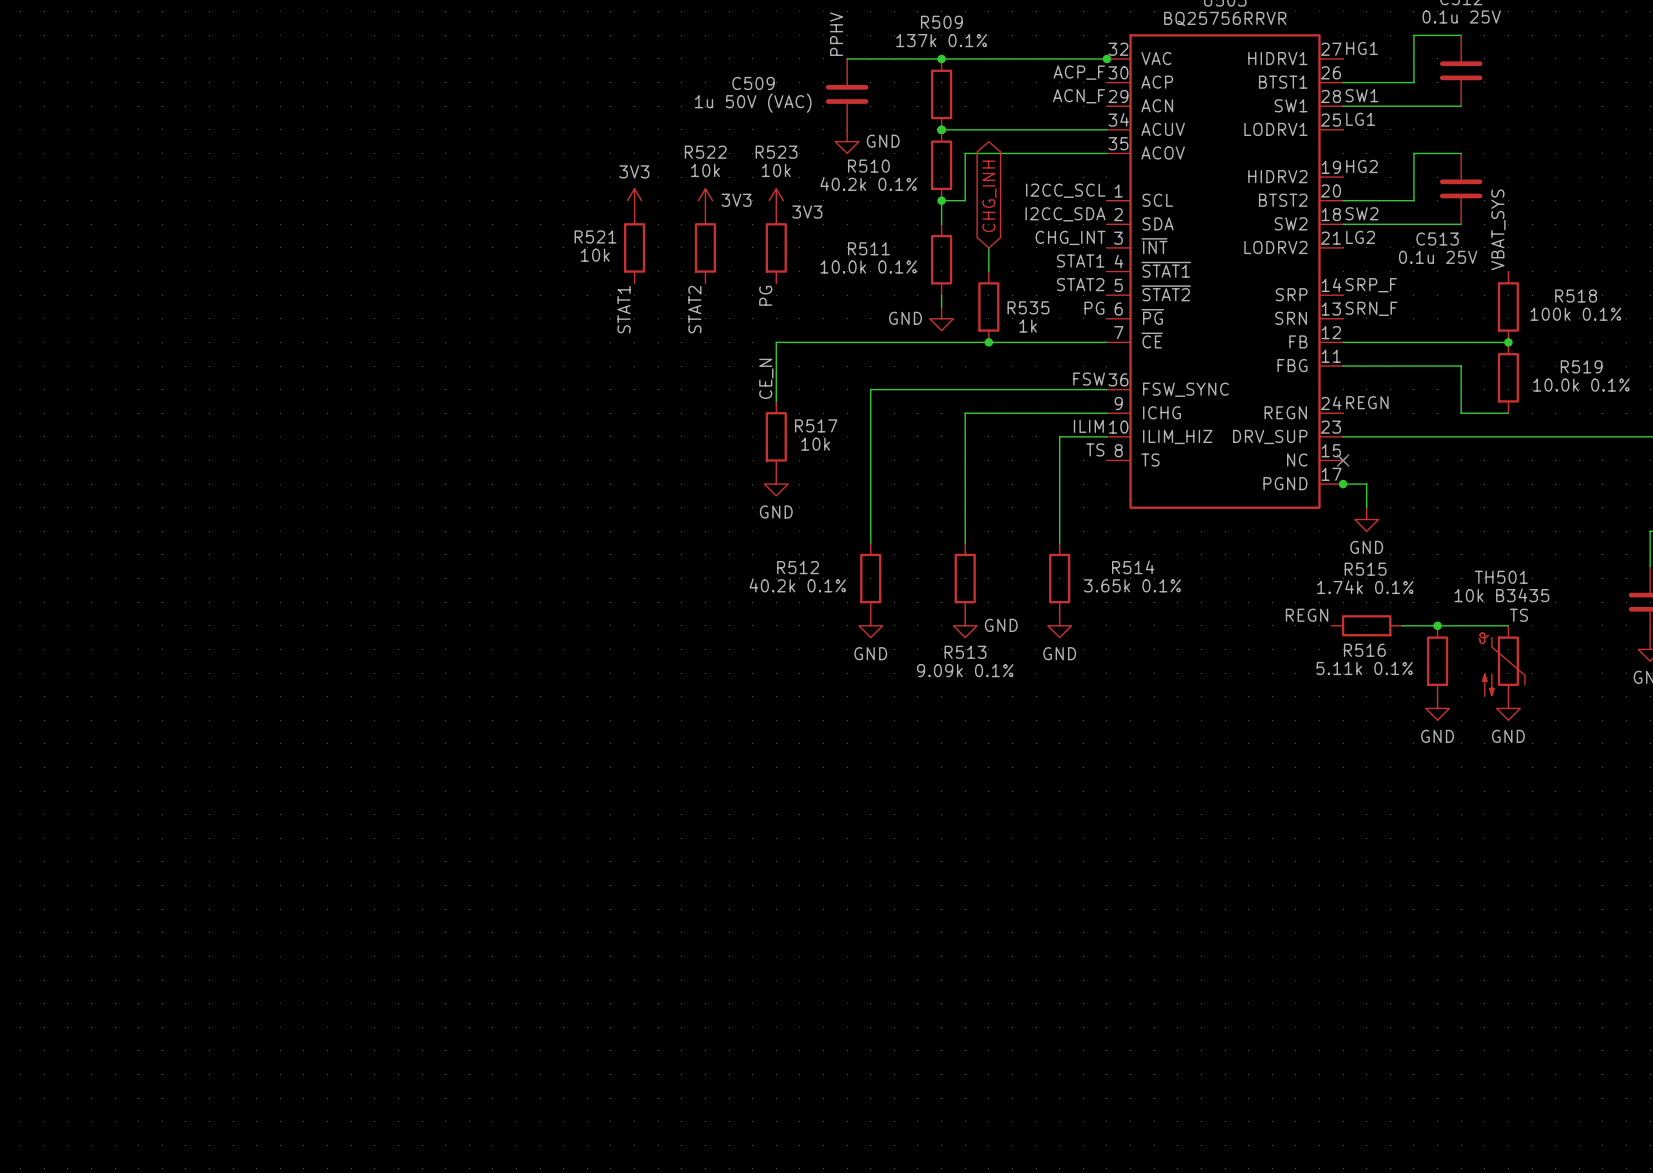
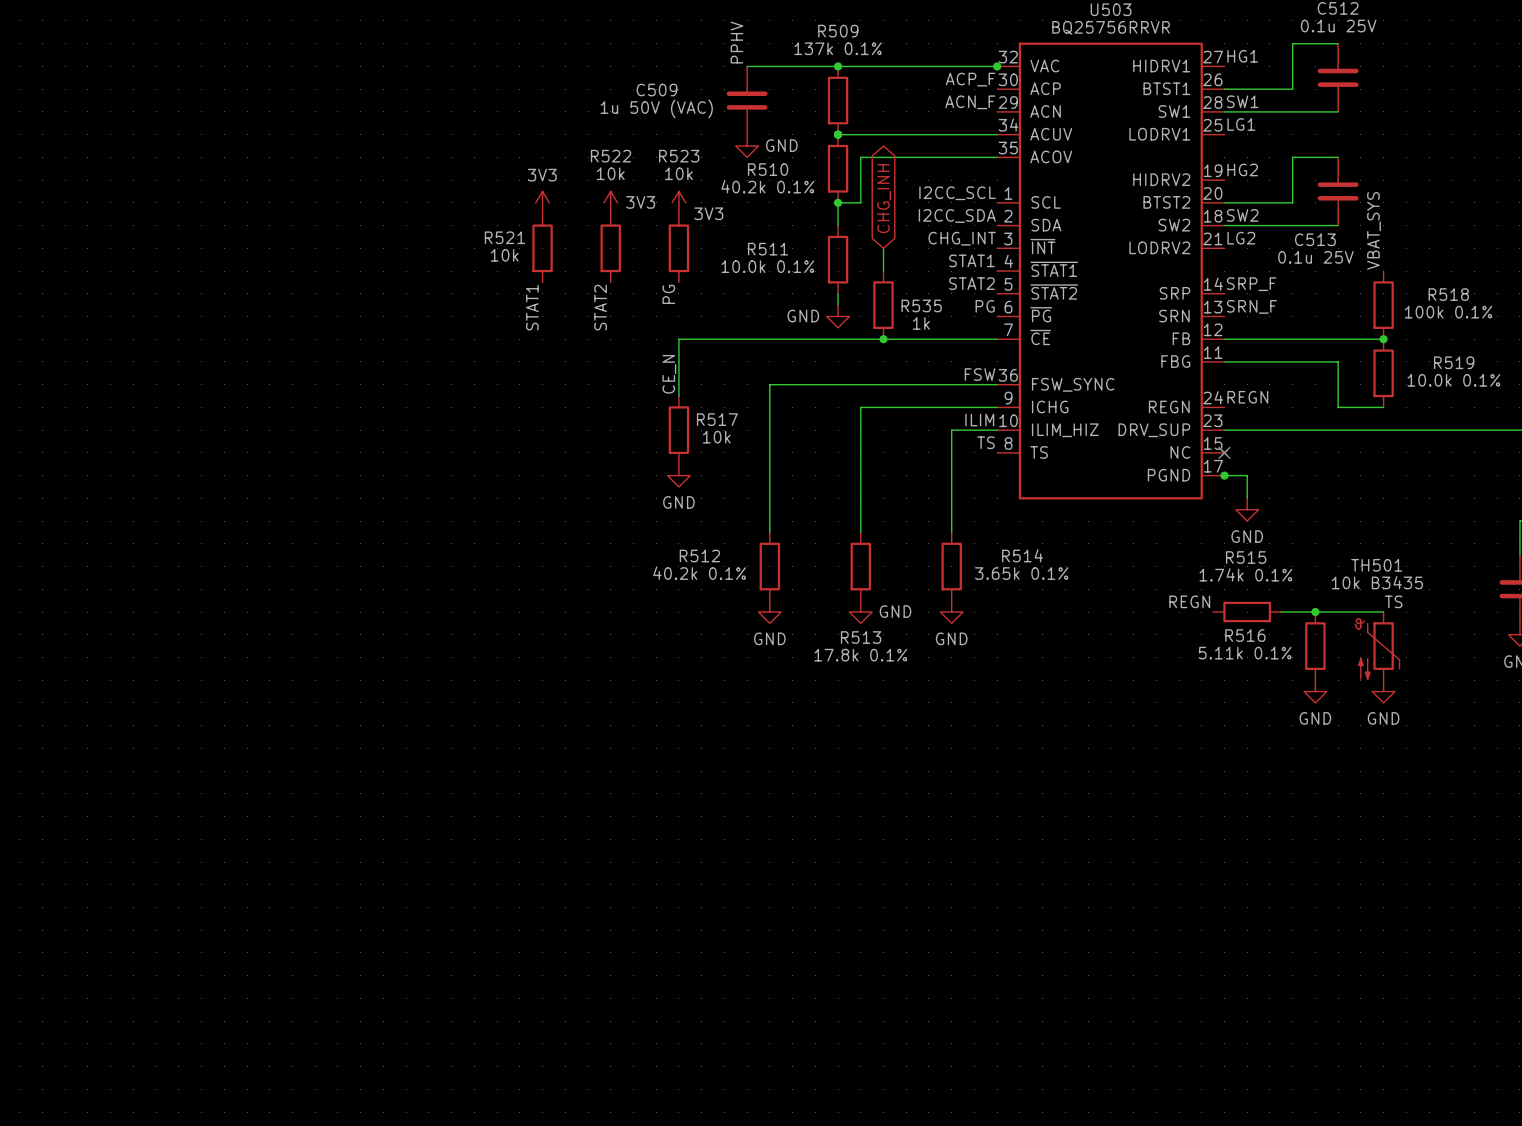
R513 value: 9.09k 0.1% (965, 670) -> 17.8k 0.1% (860, 655)

